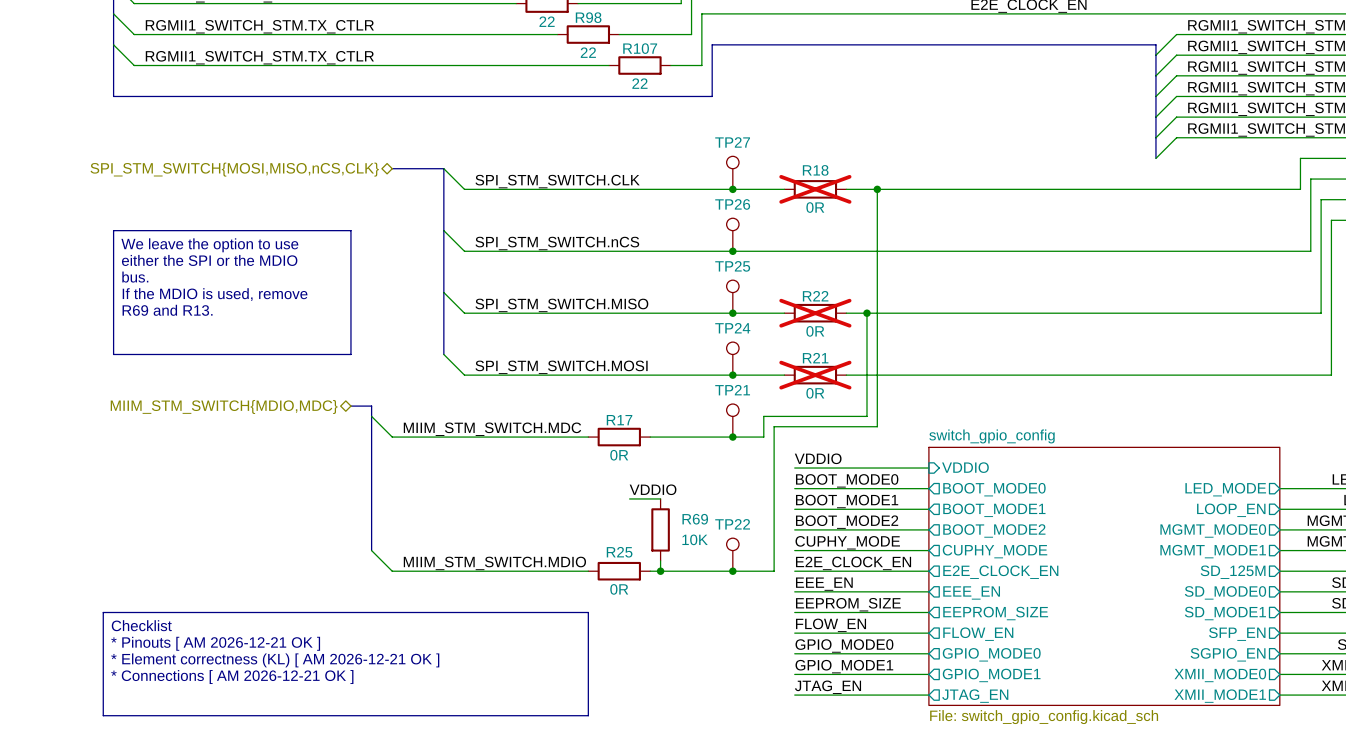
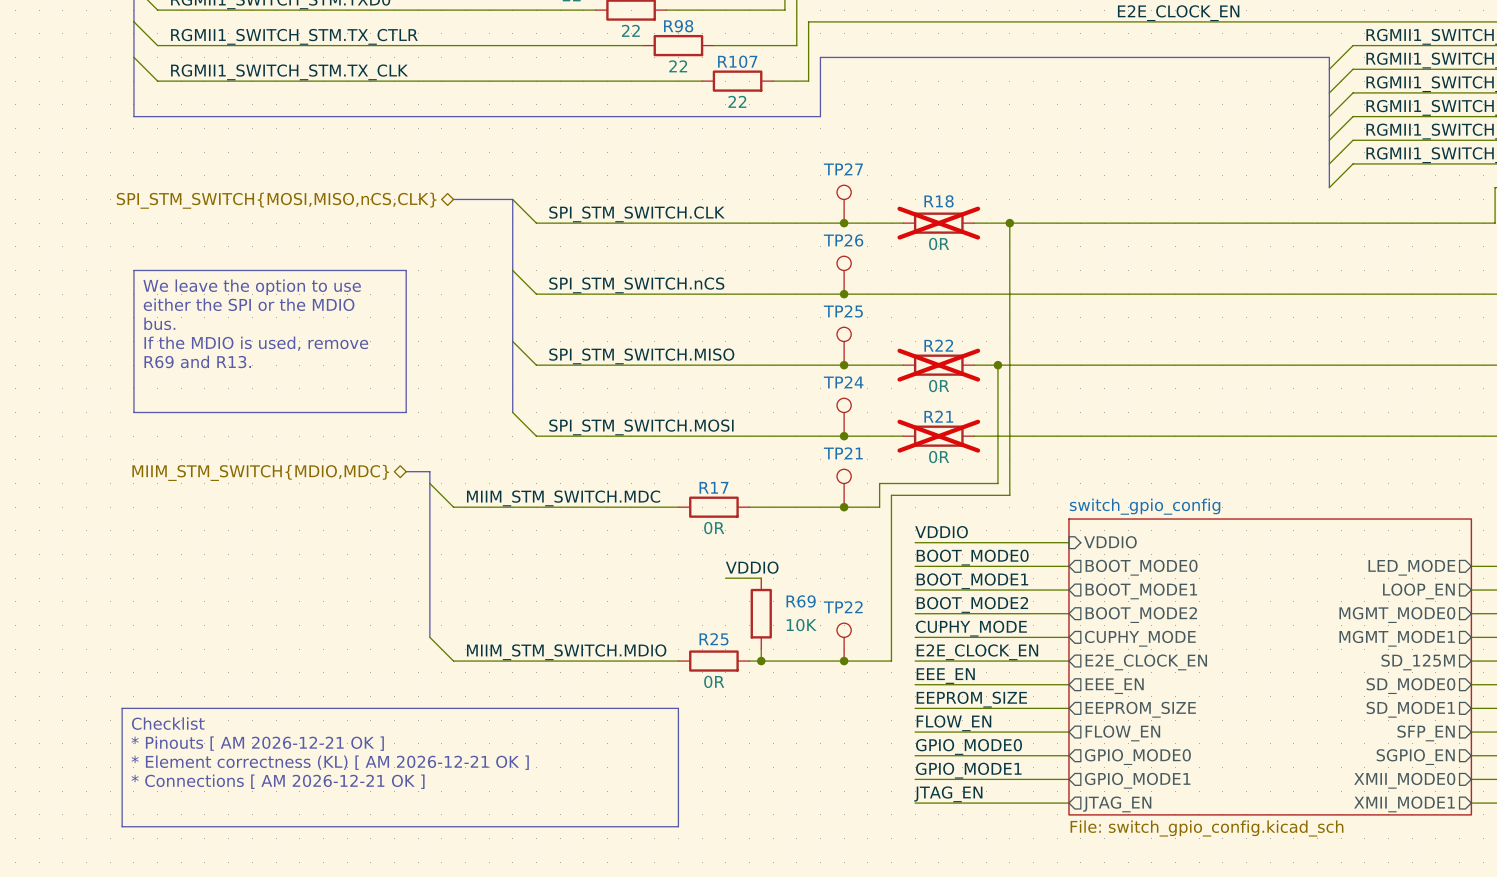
label: RGMII1_SWITCH_STM.TX_CTLR (259, 57) -> RGMII1_SWITCH_STM.TX_CLK (289, 72)

